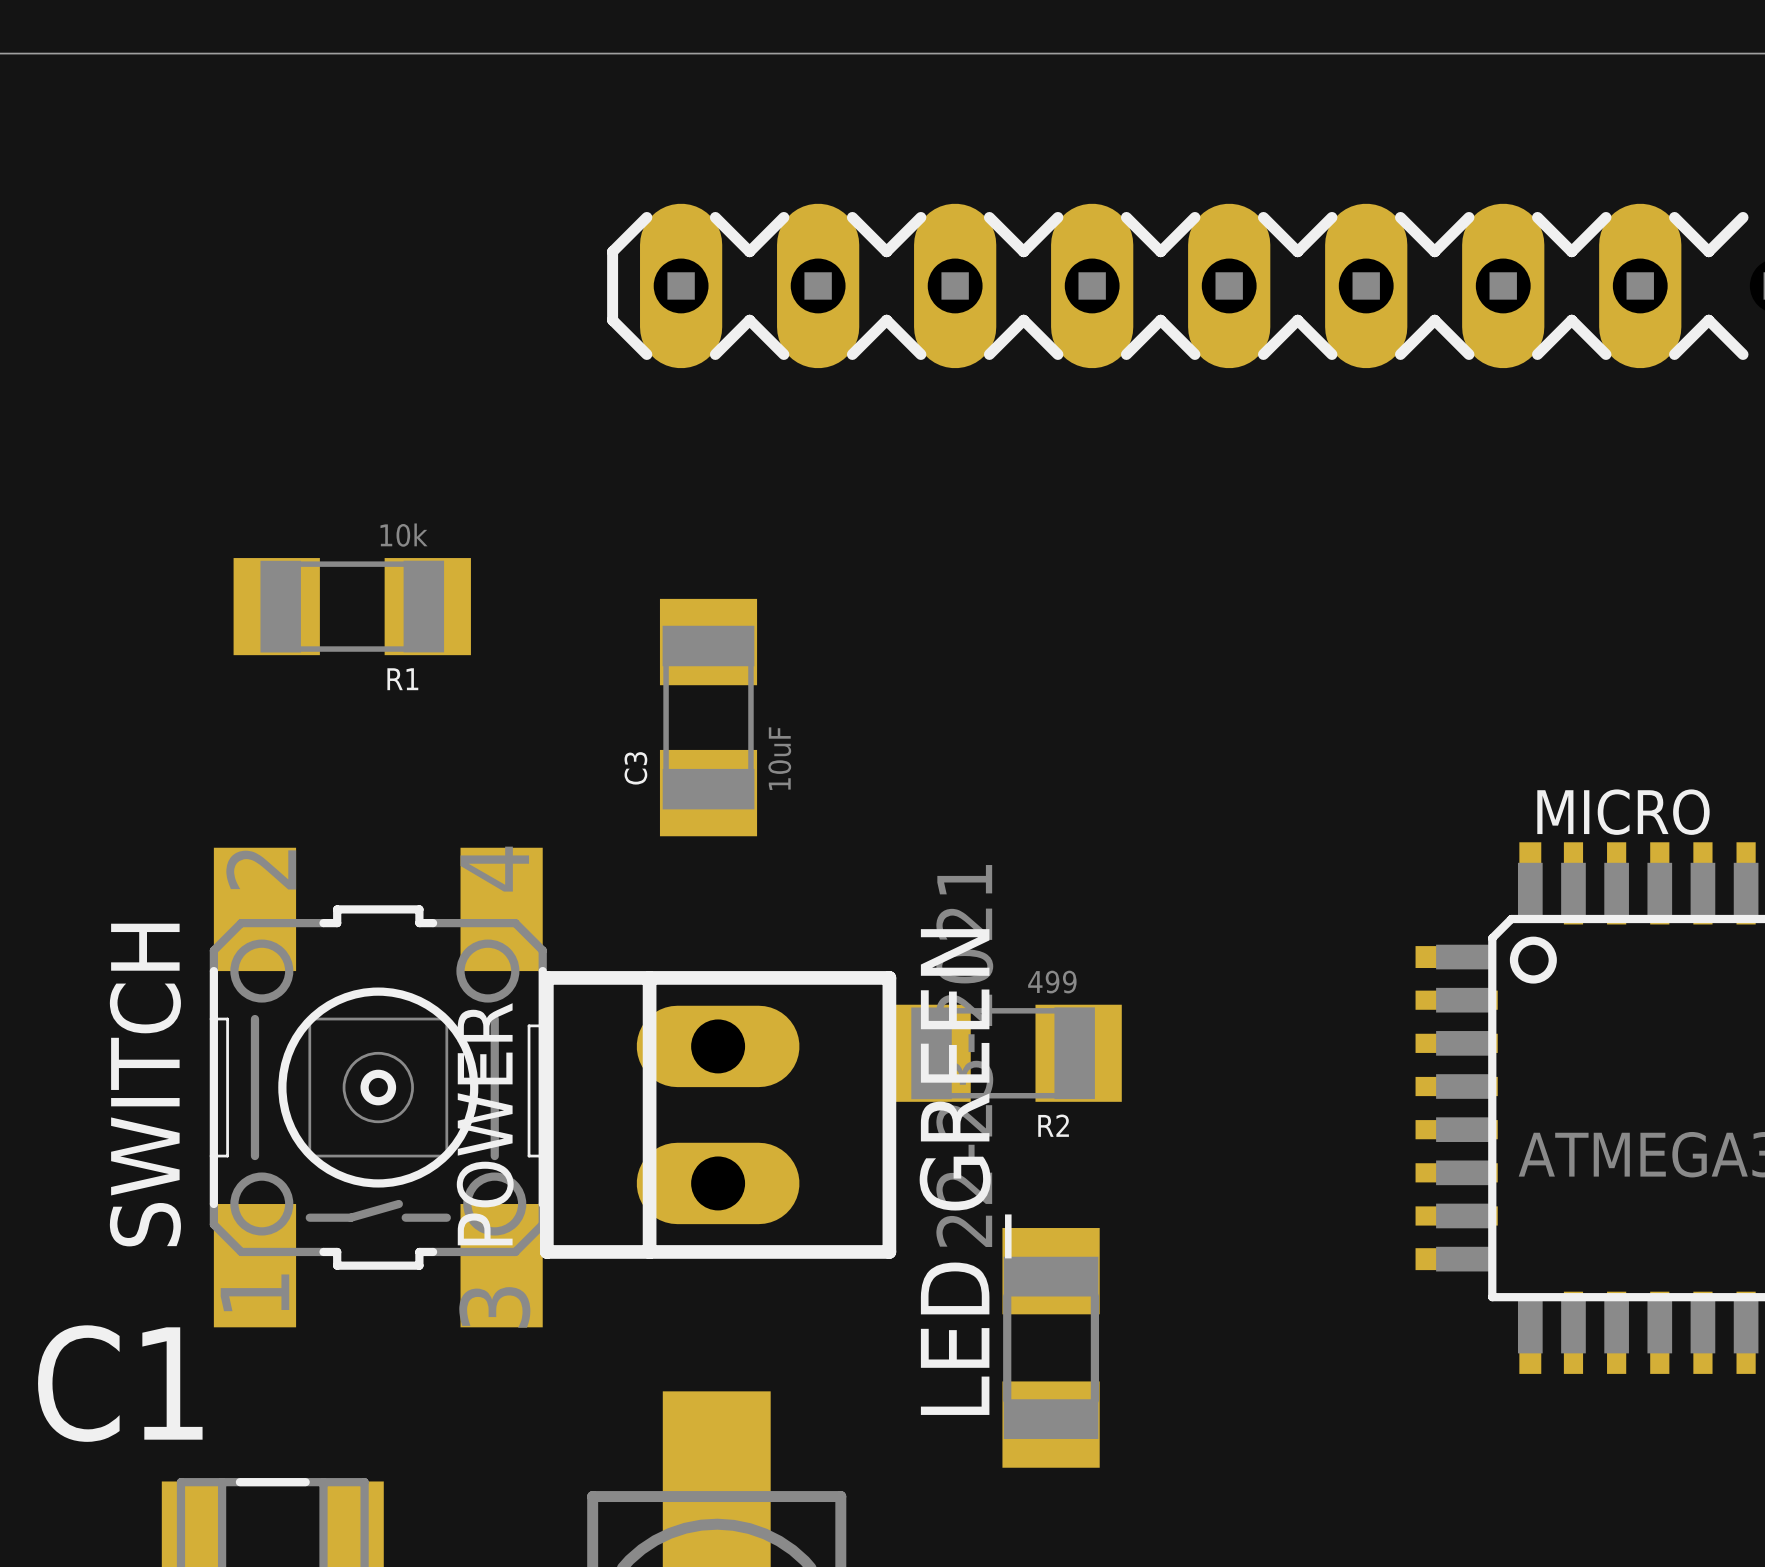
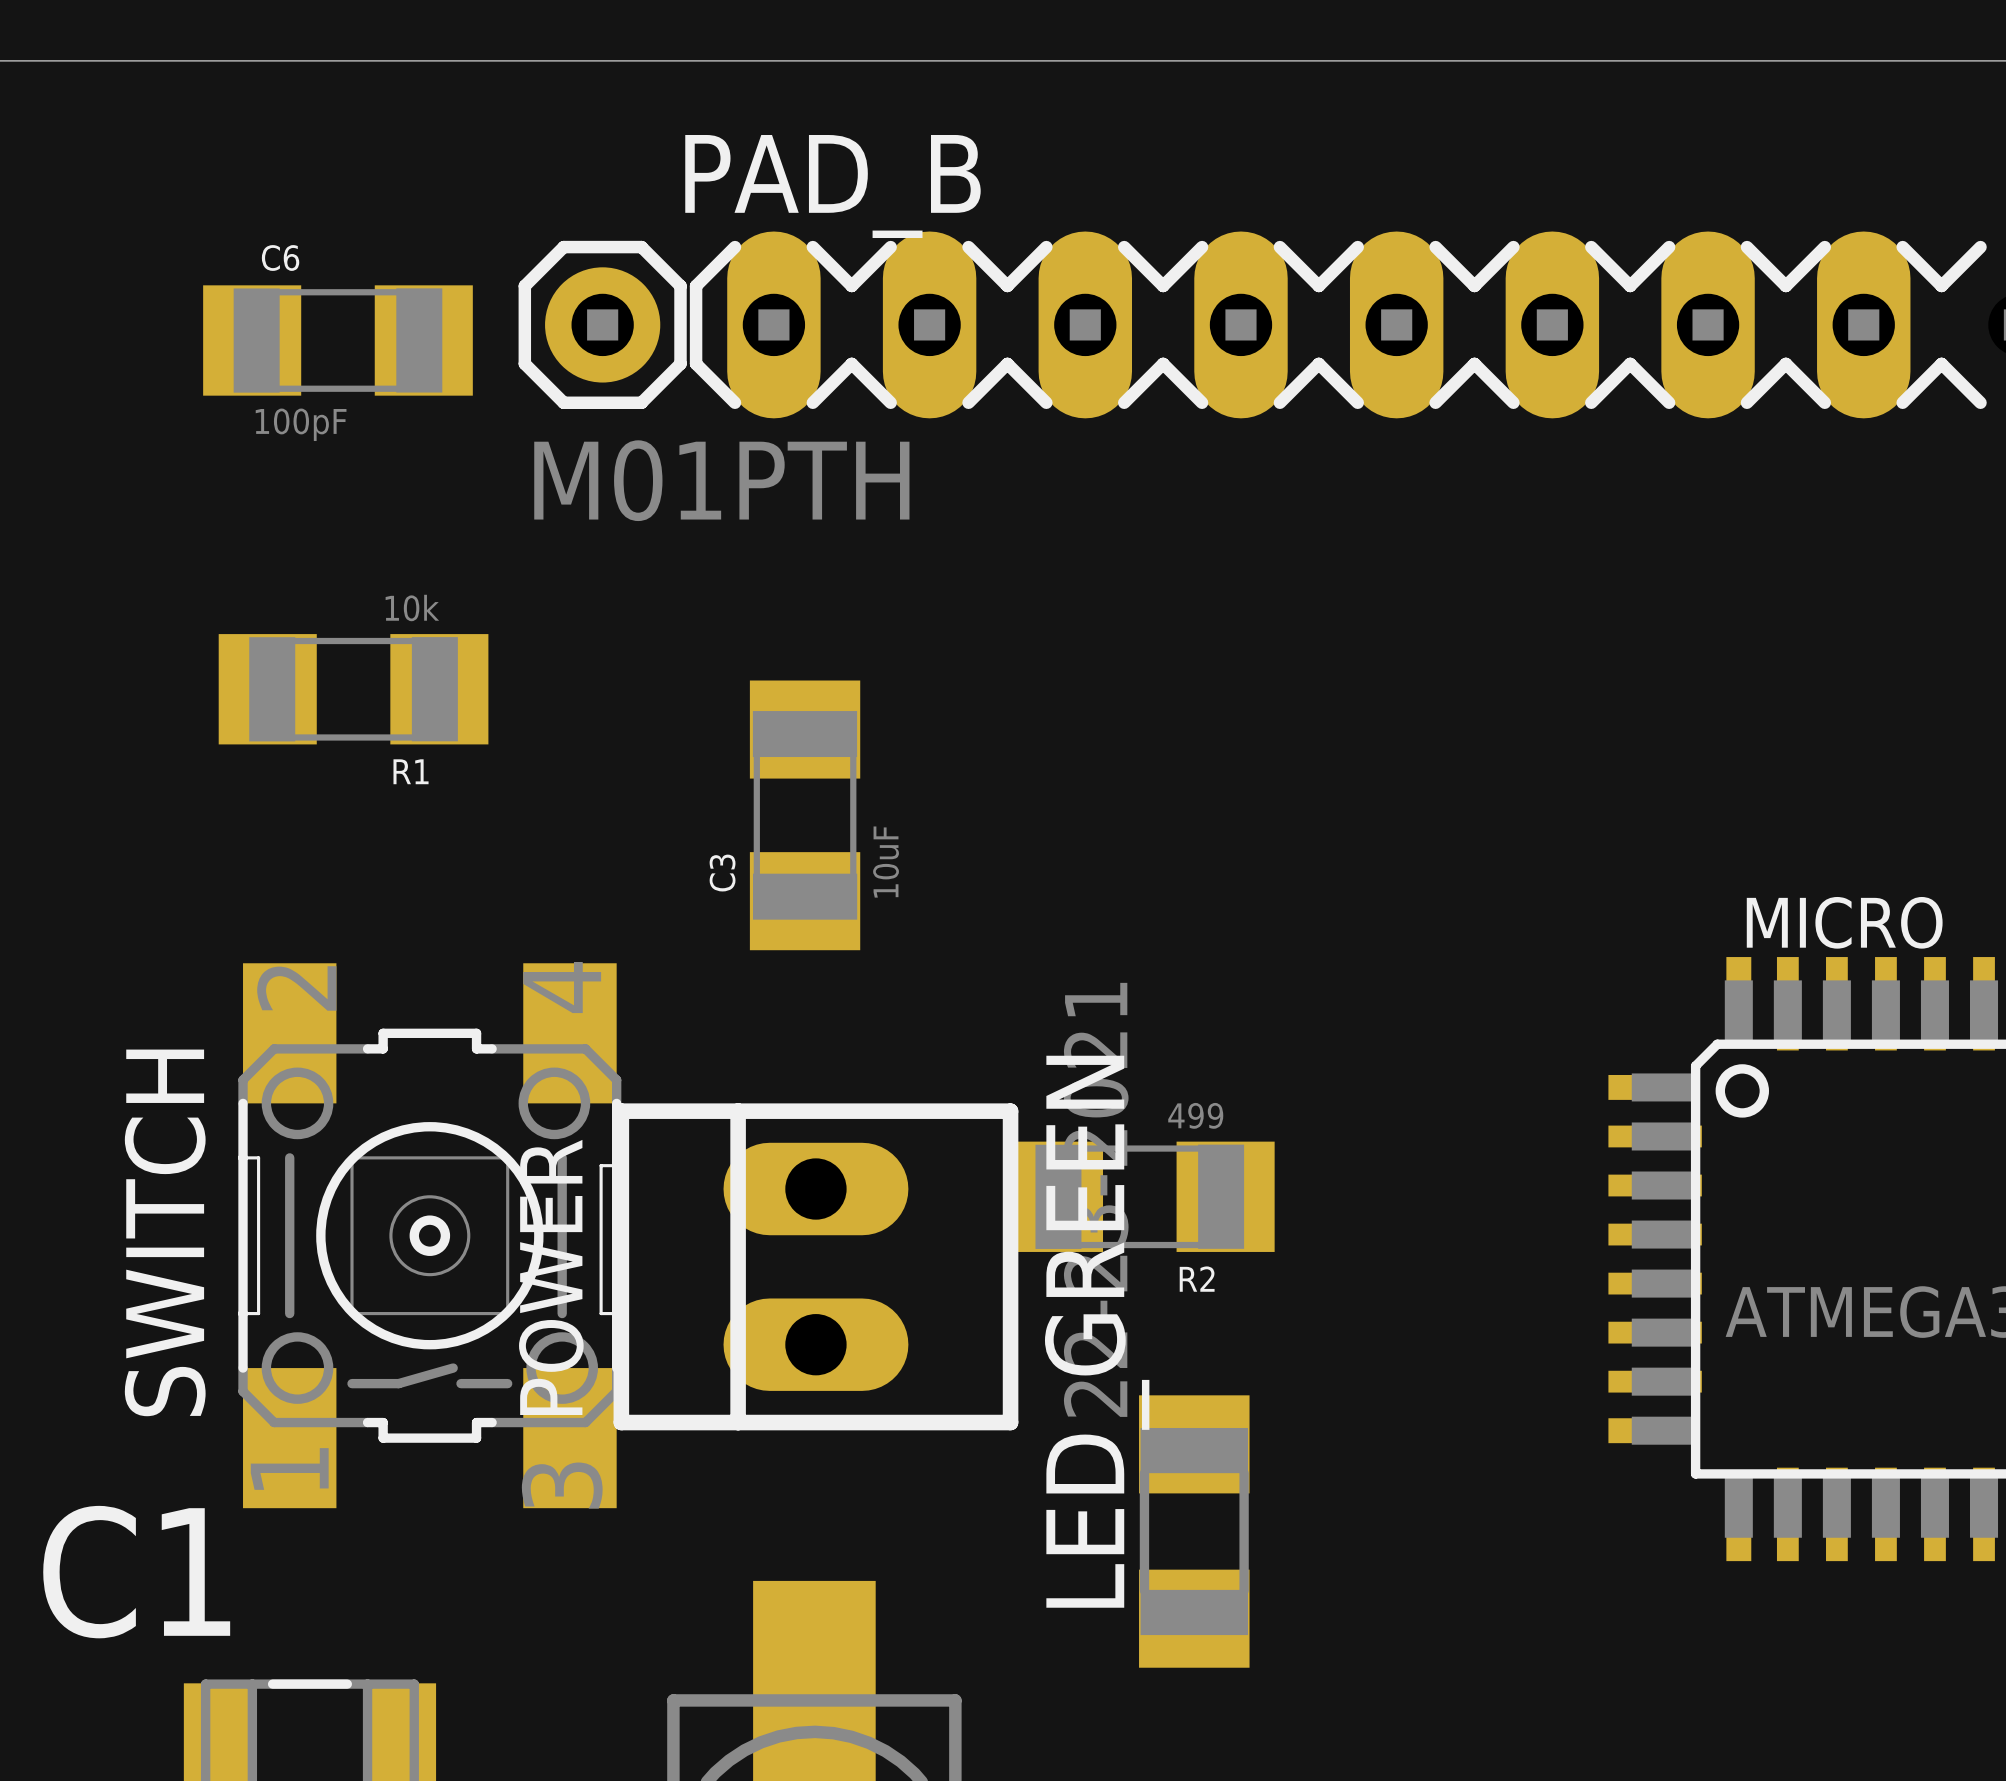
PAD_B: none -> M01PTH (602, 324)
C6: none -> 100pF (337, 340)
R1 position: (352, 606) -> (353, 689)

